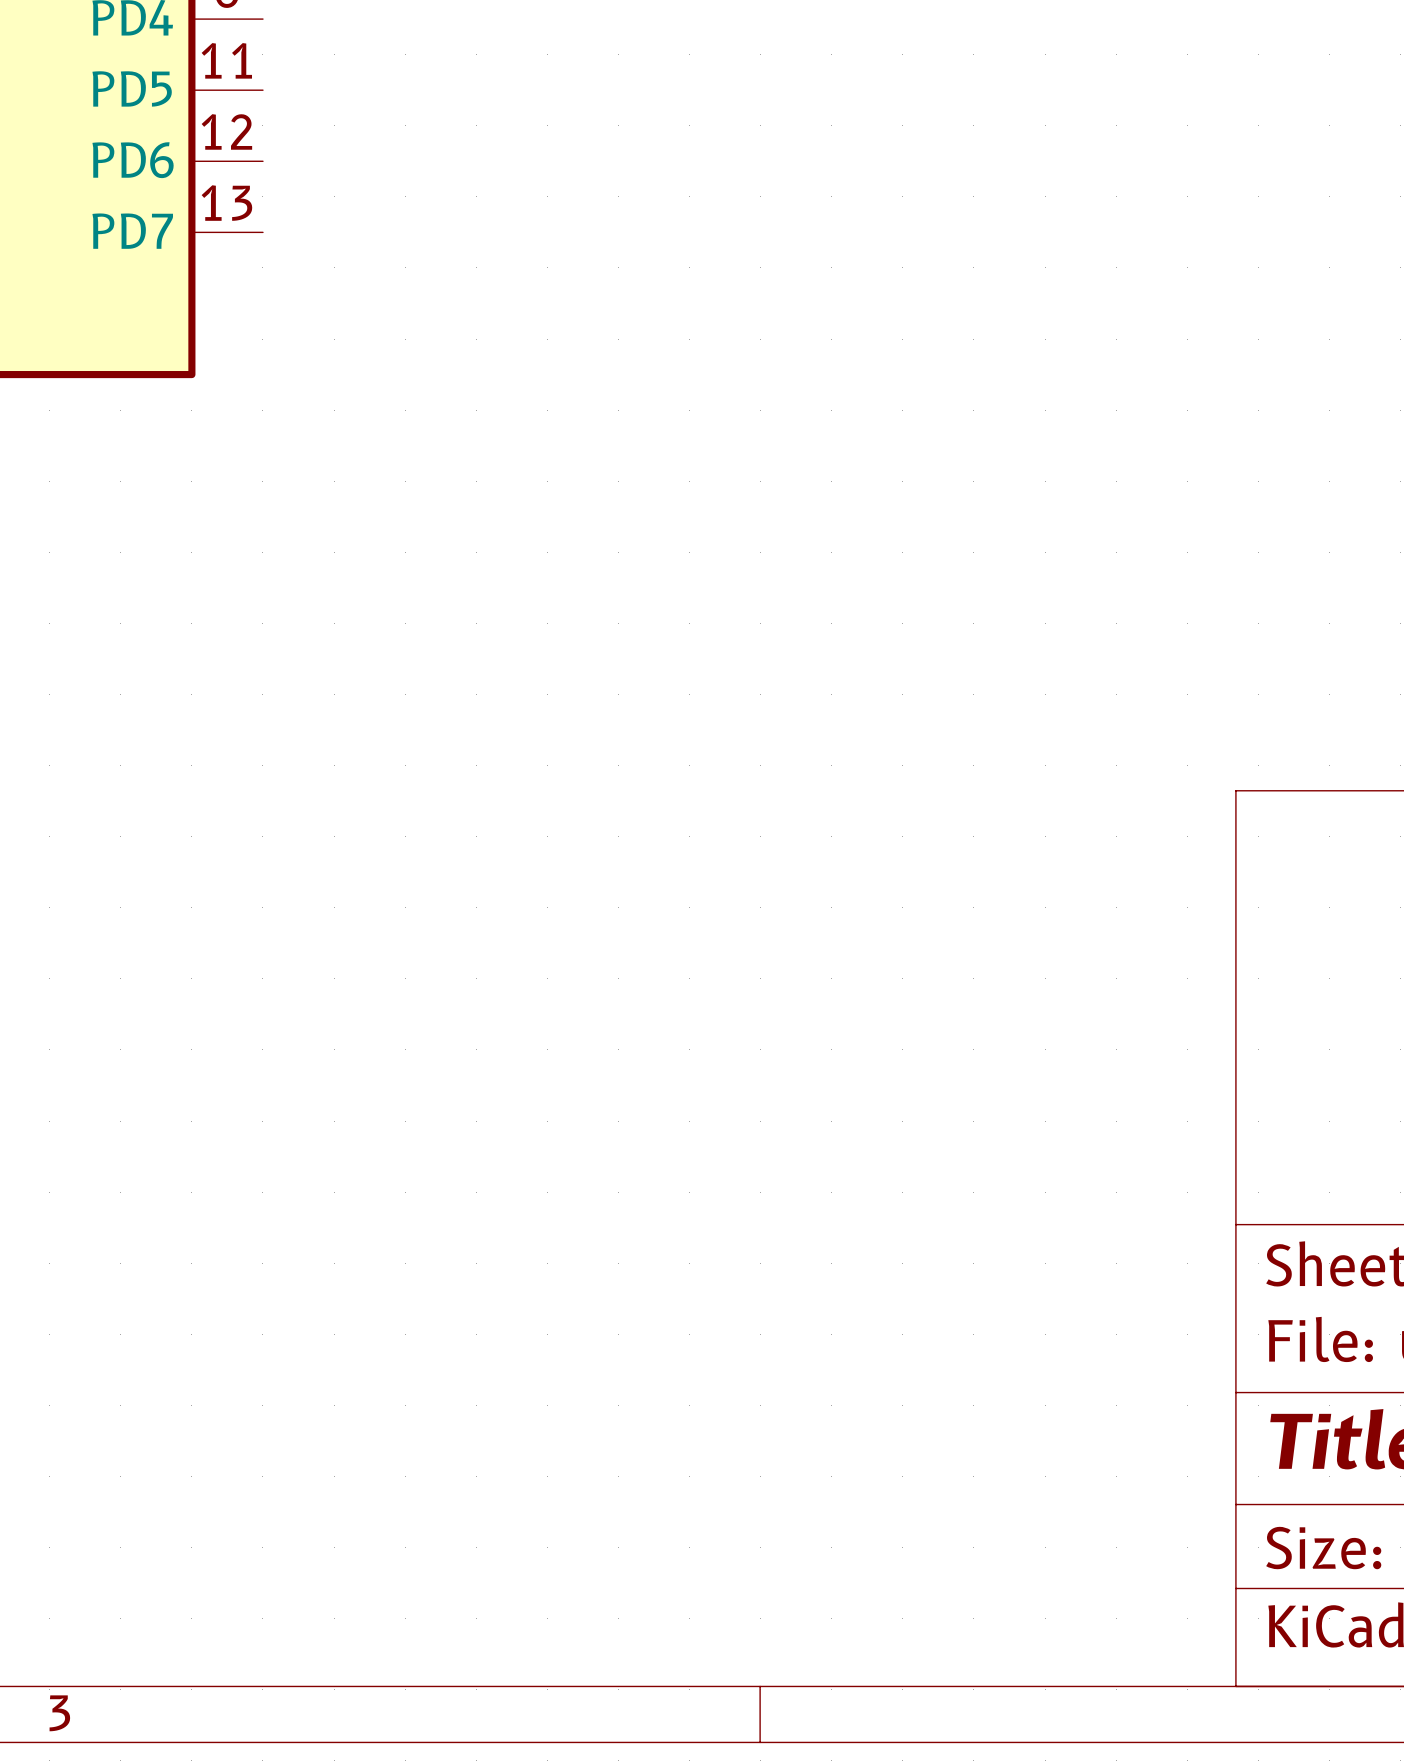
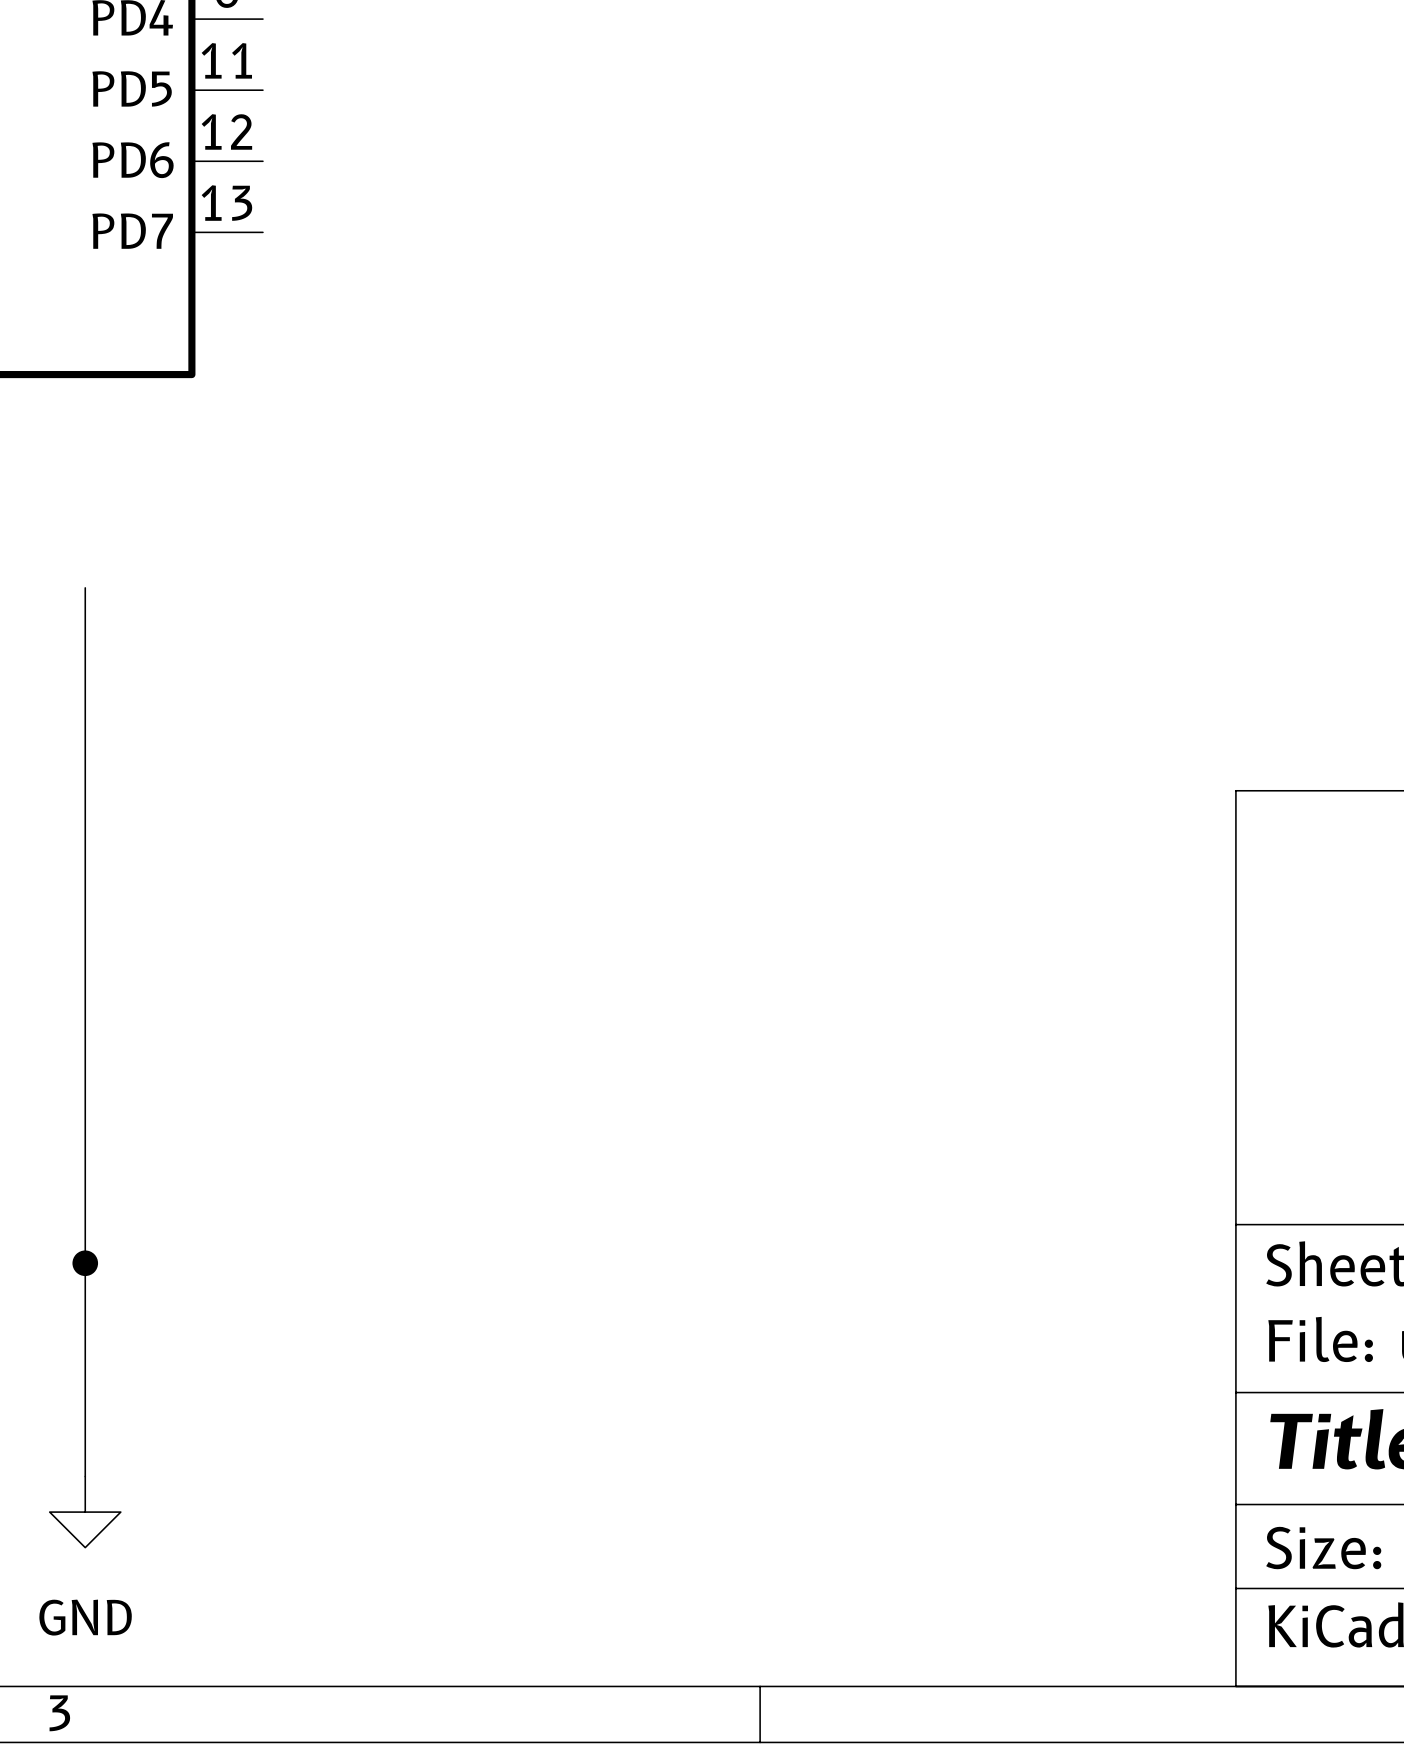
wire: none -> (85, 587) (85, 1476)
junction: none -> (85, 1263)
power symbol: none -> GND (85, 1512)

